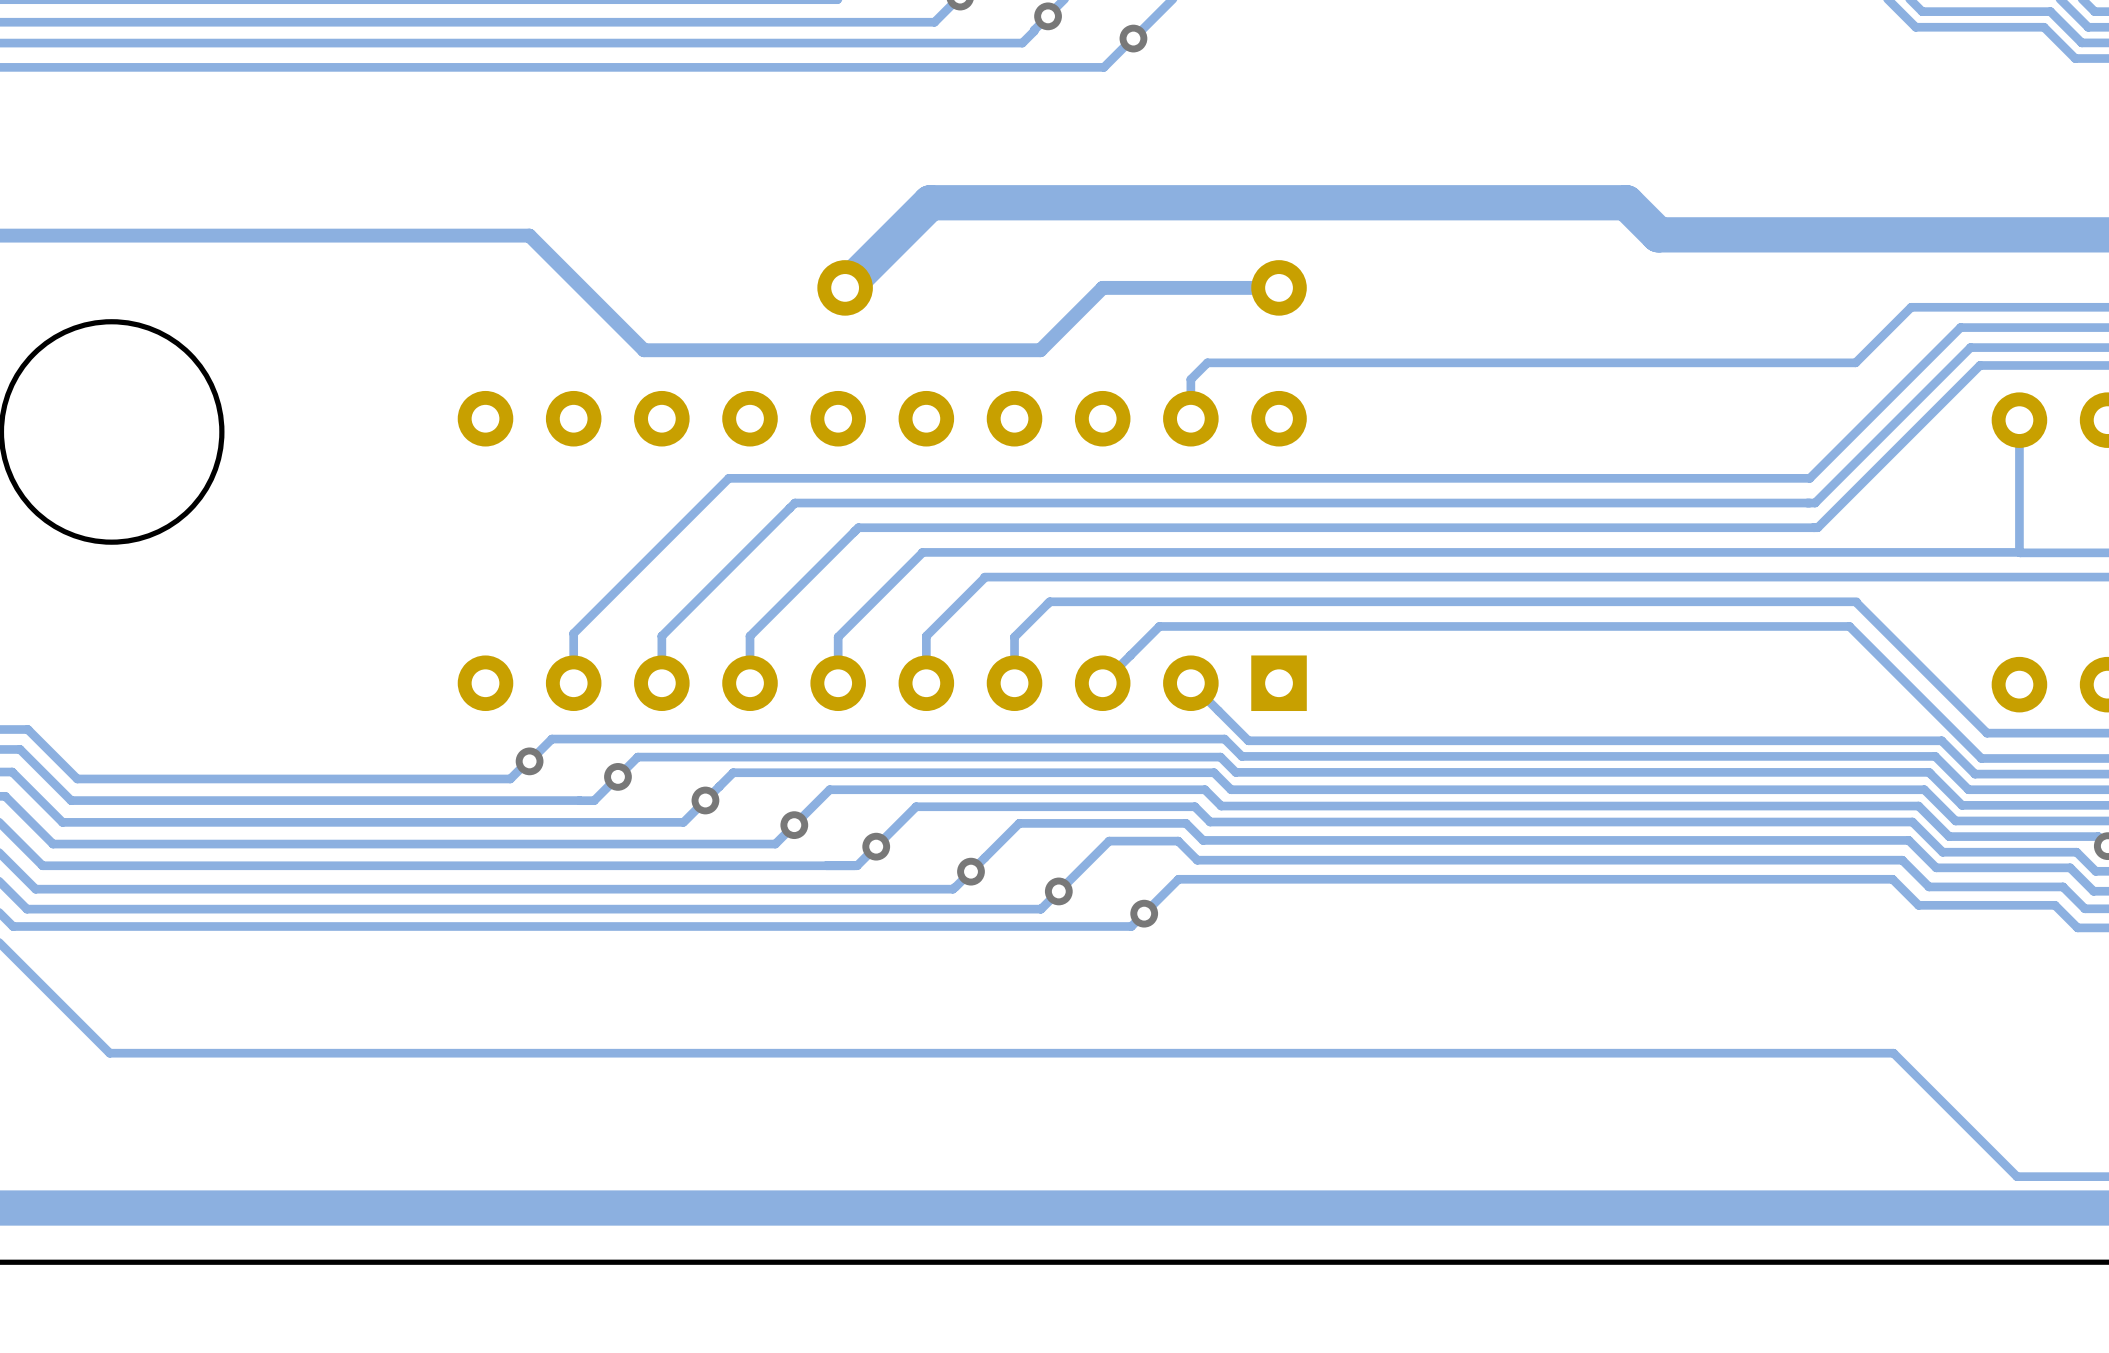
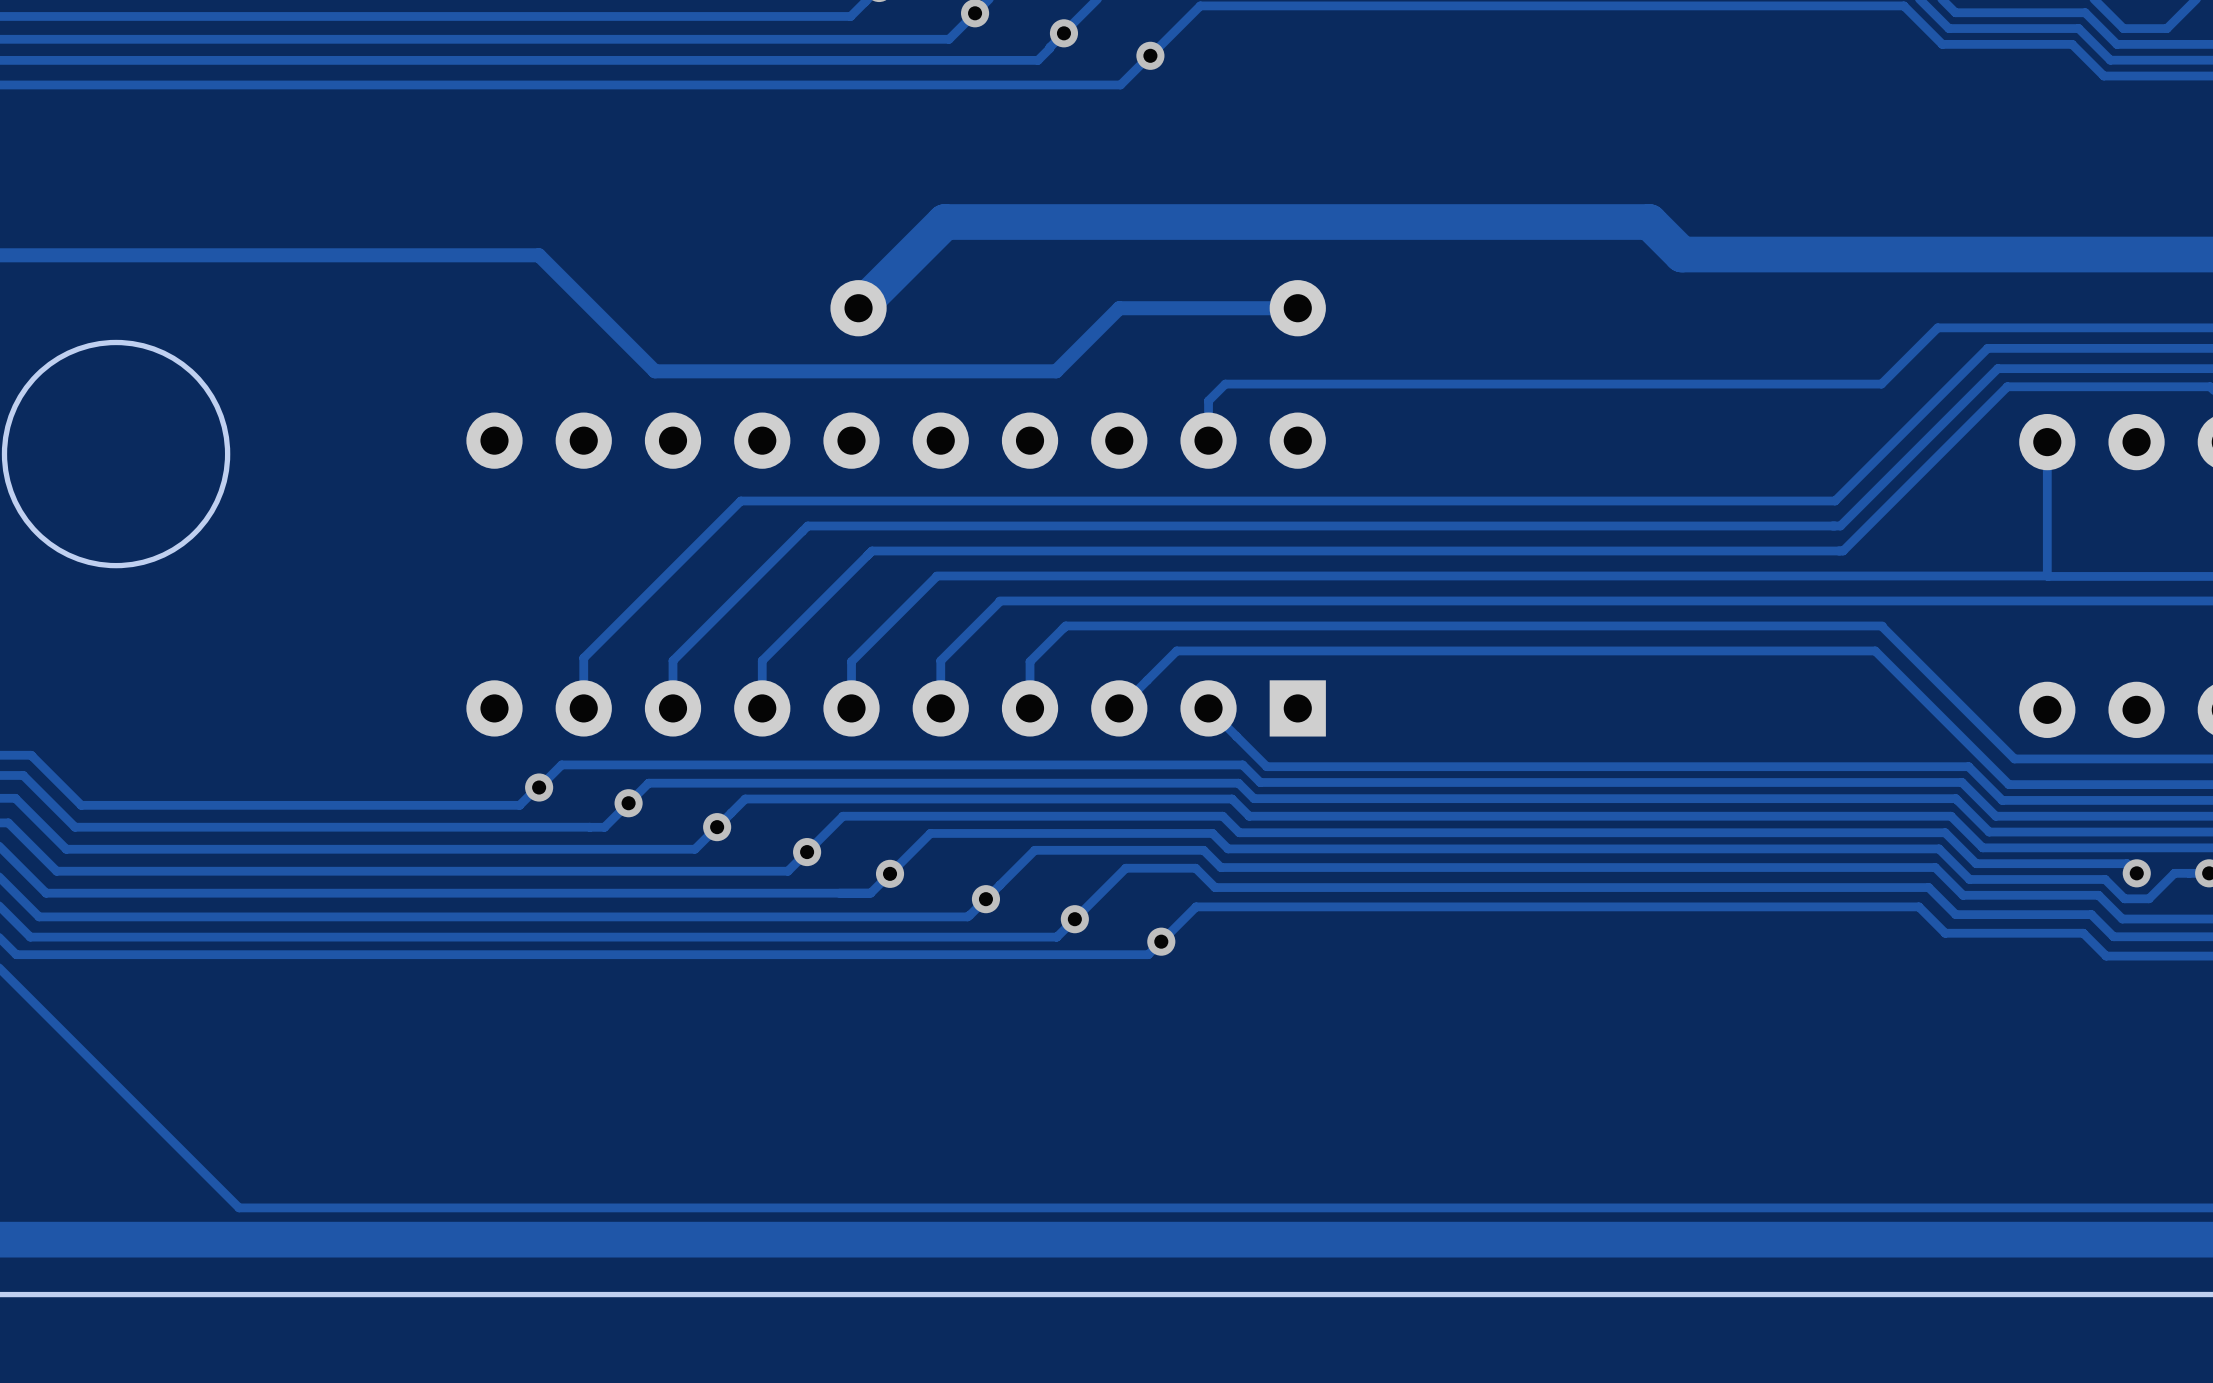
track: (109, 1053) (1893, 1053) (2017, 1176) -> (114, 1082) (239, 1207) (2044, 1207)

